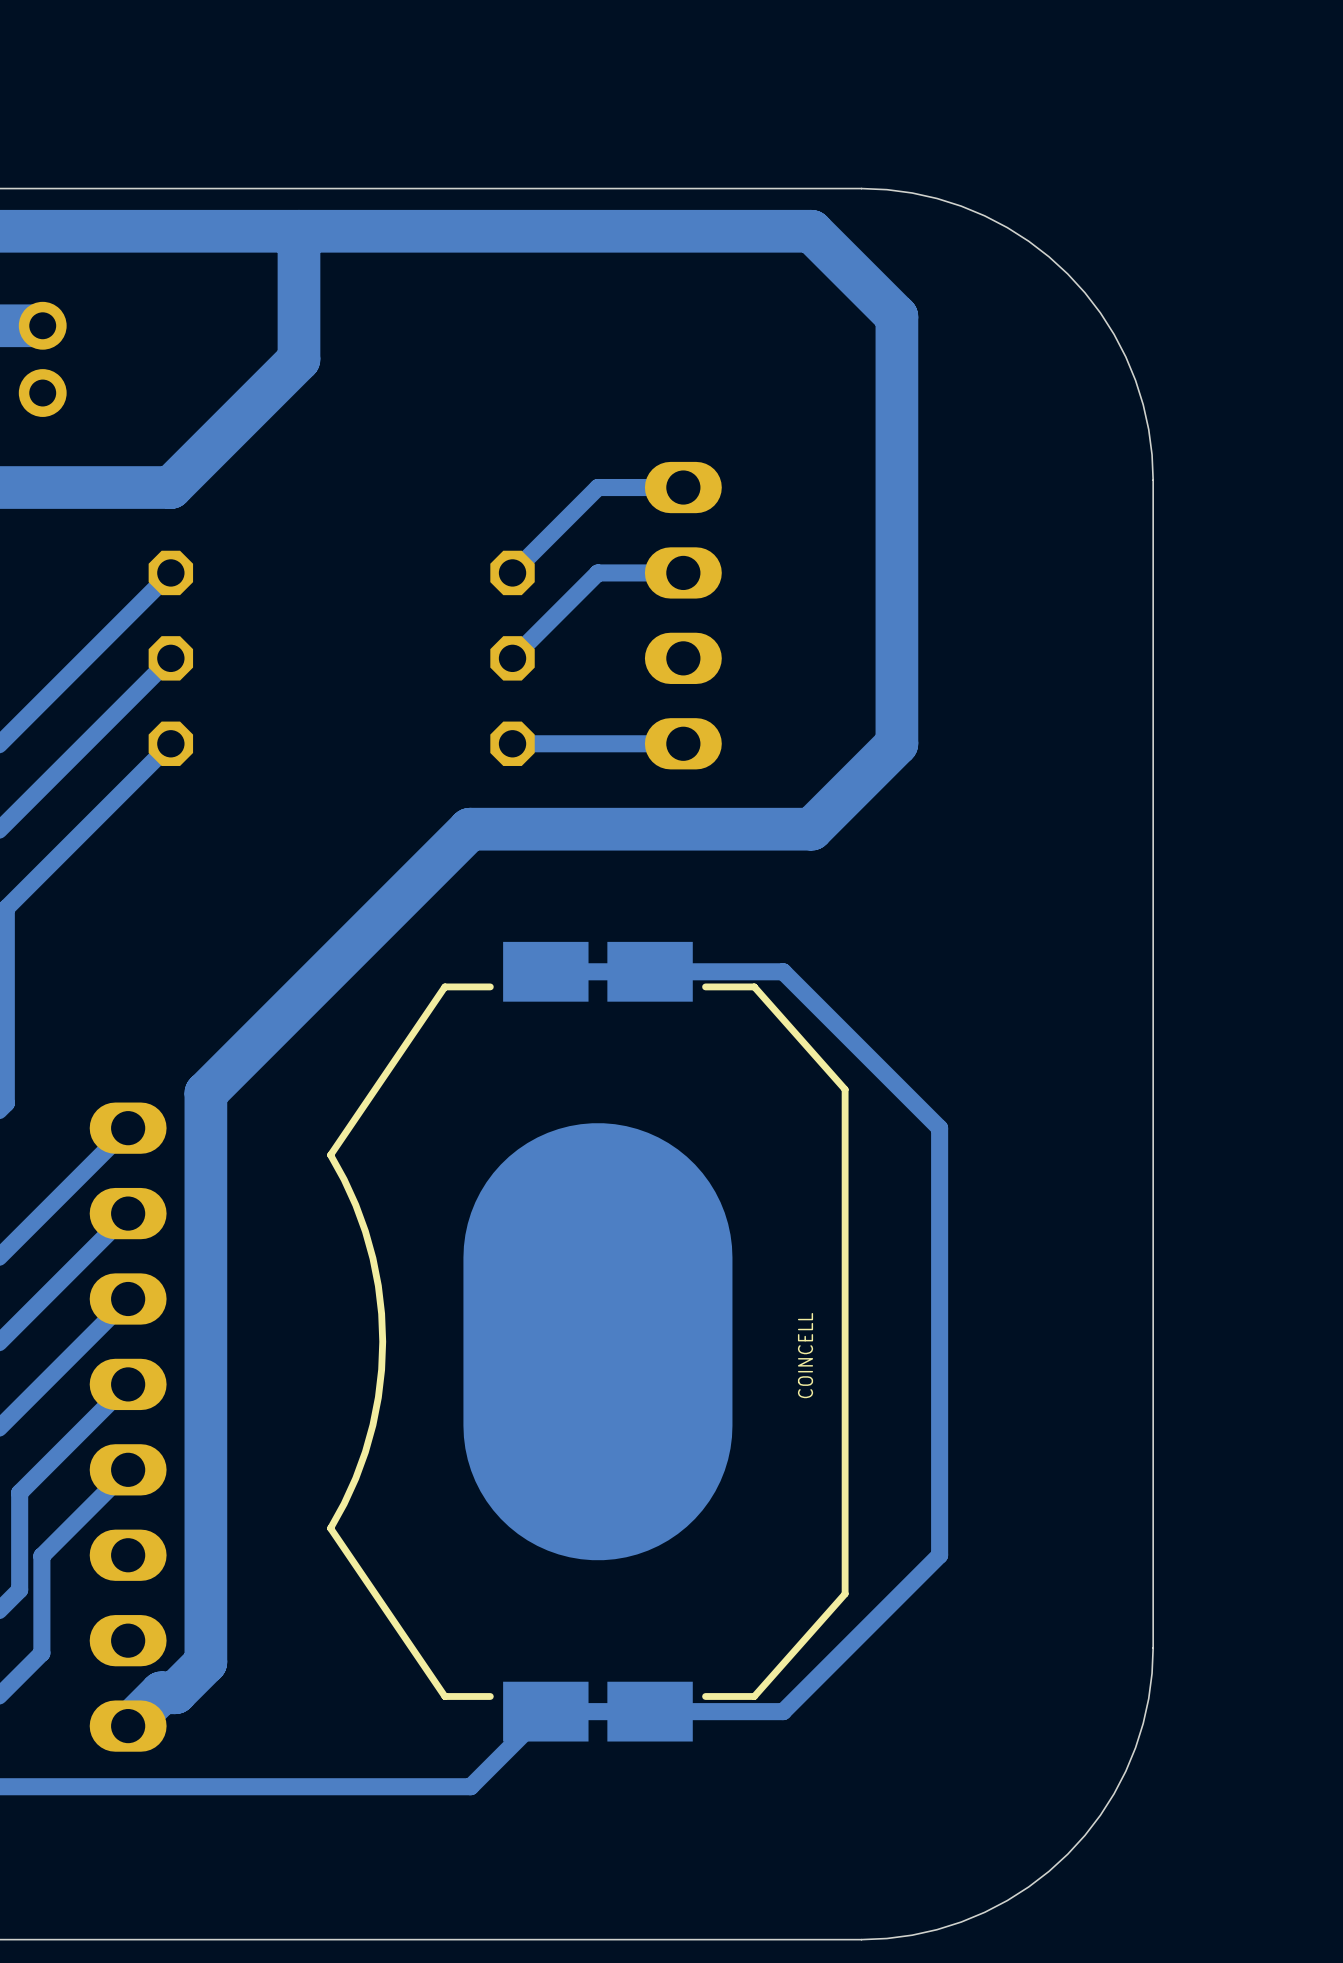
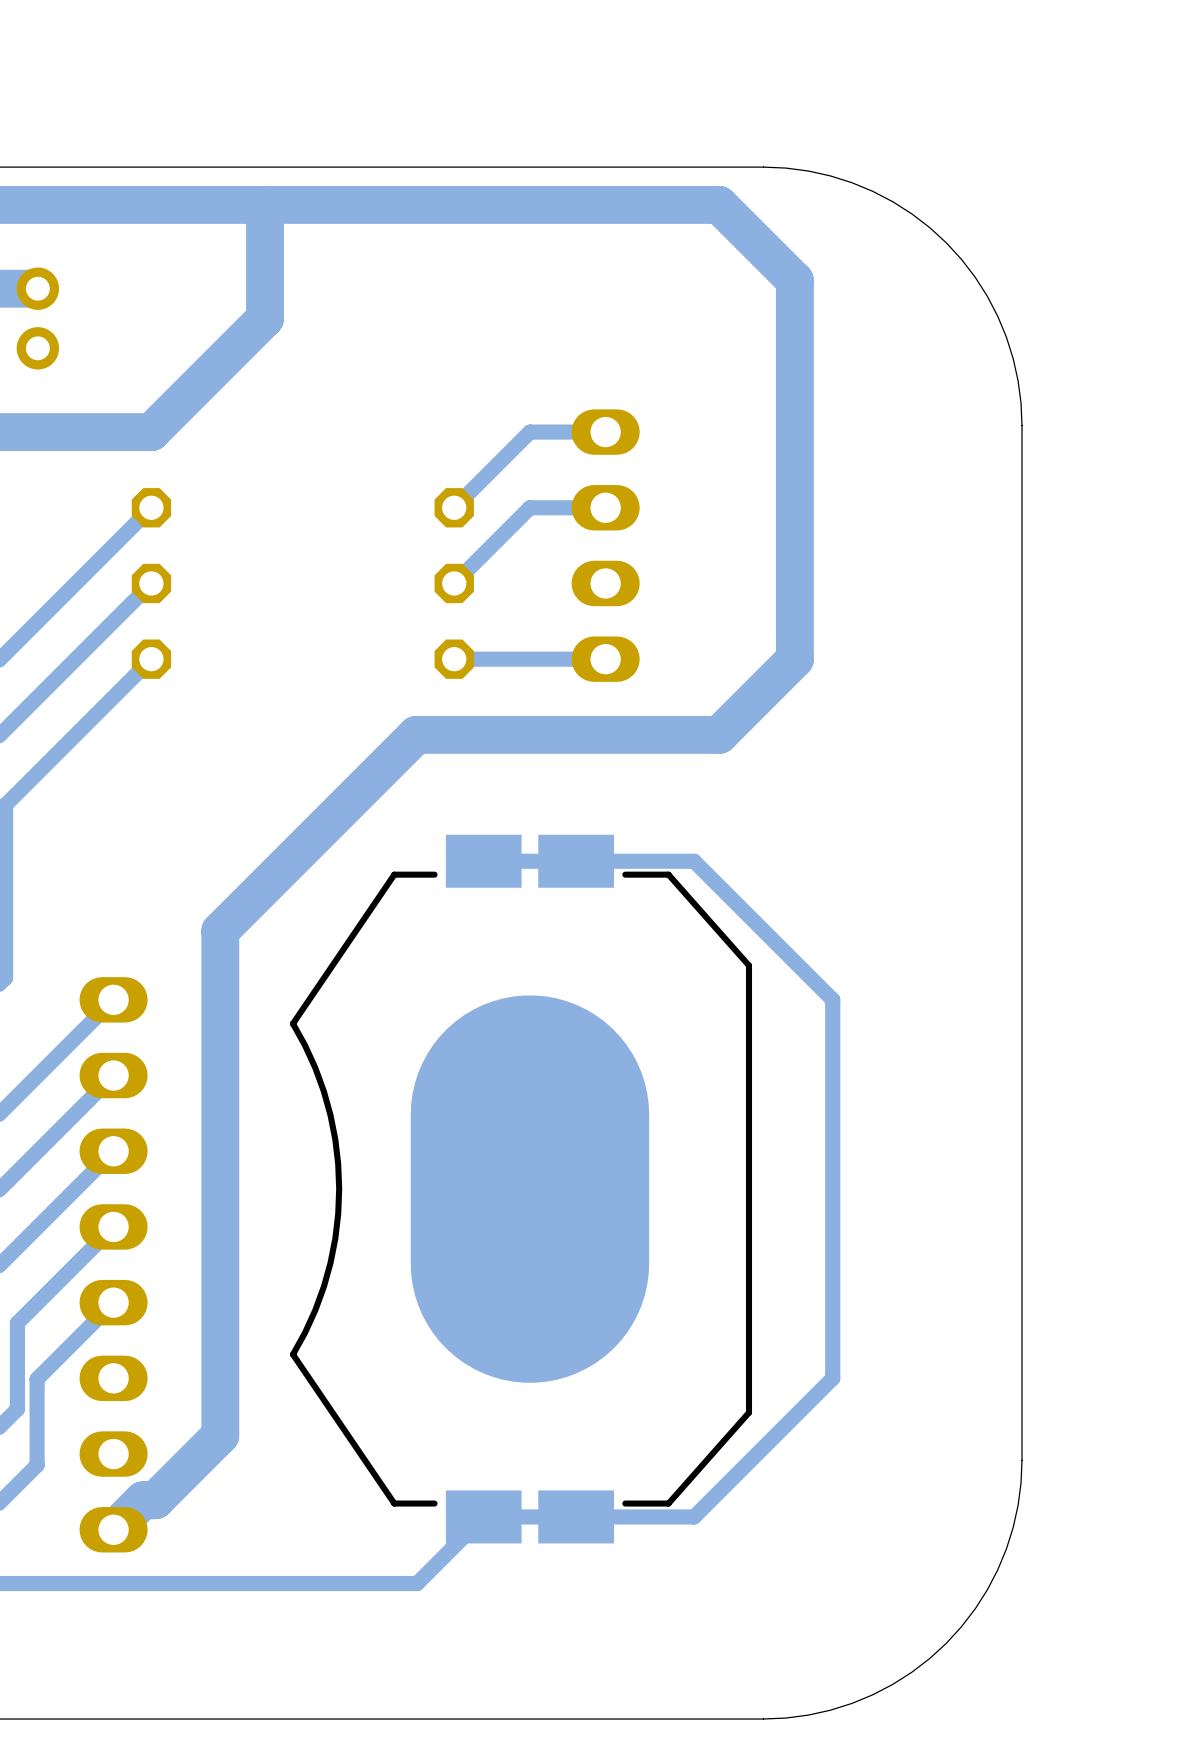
bottom track: (248, 1050) (205, 1093) (205, 1662) -> (220, 930) (220, 1435) (182, 1473)
COINCELL name: COINCELL (805, 1355) -> none

